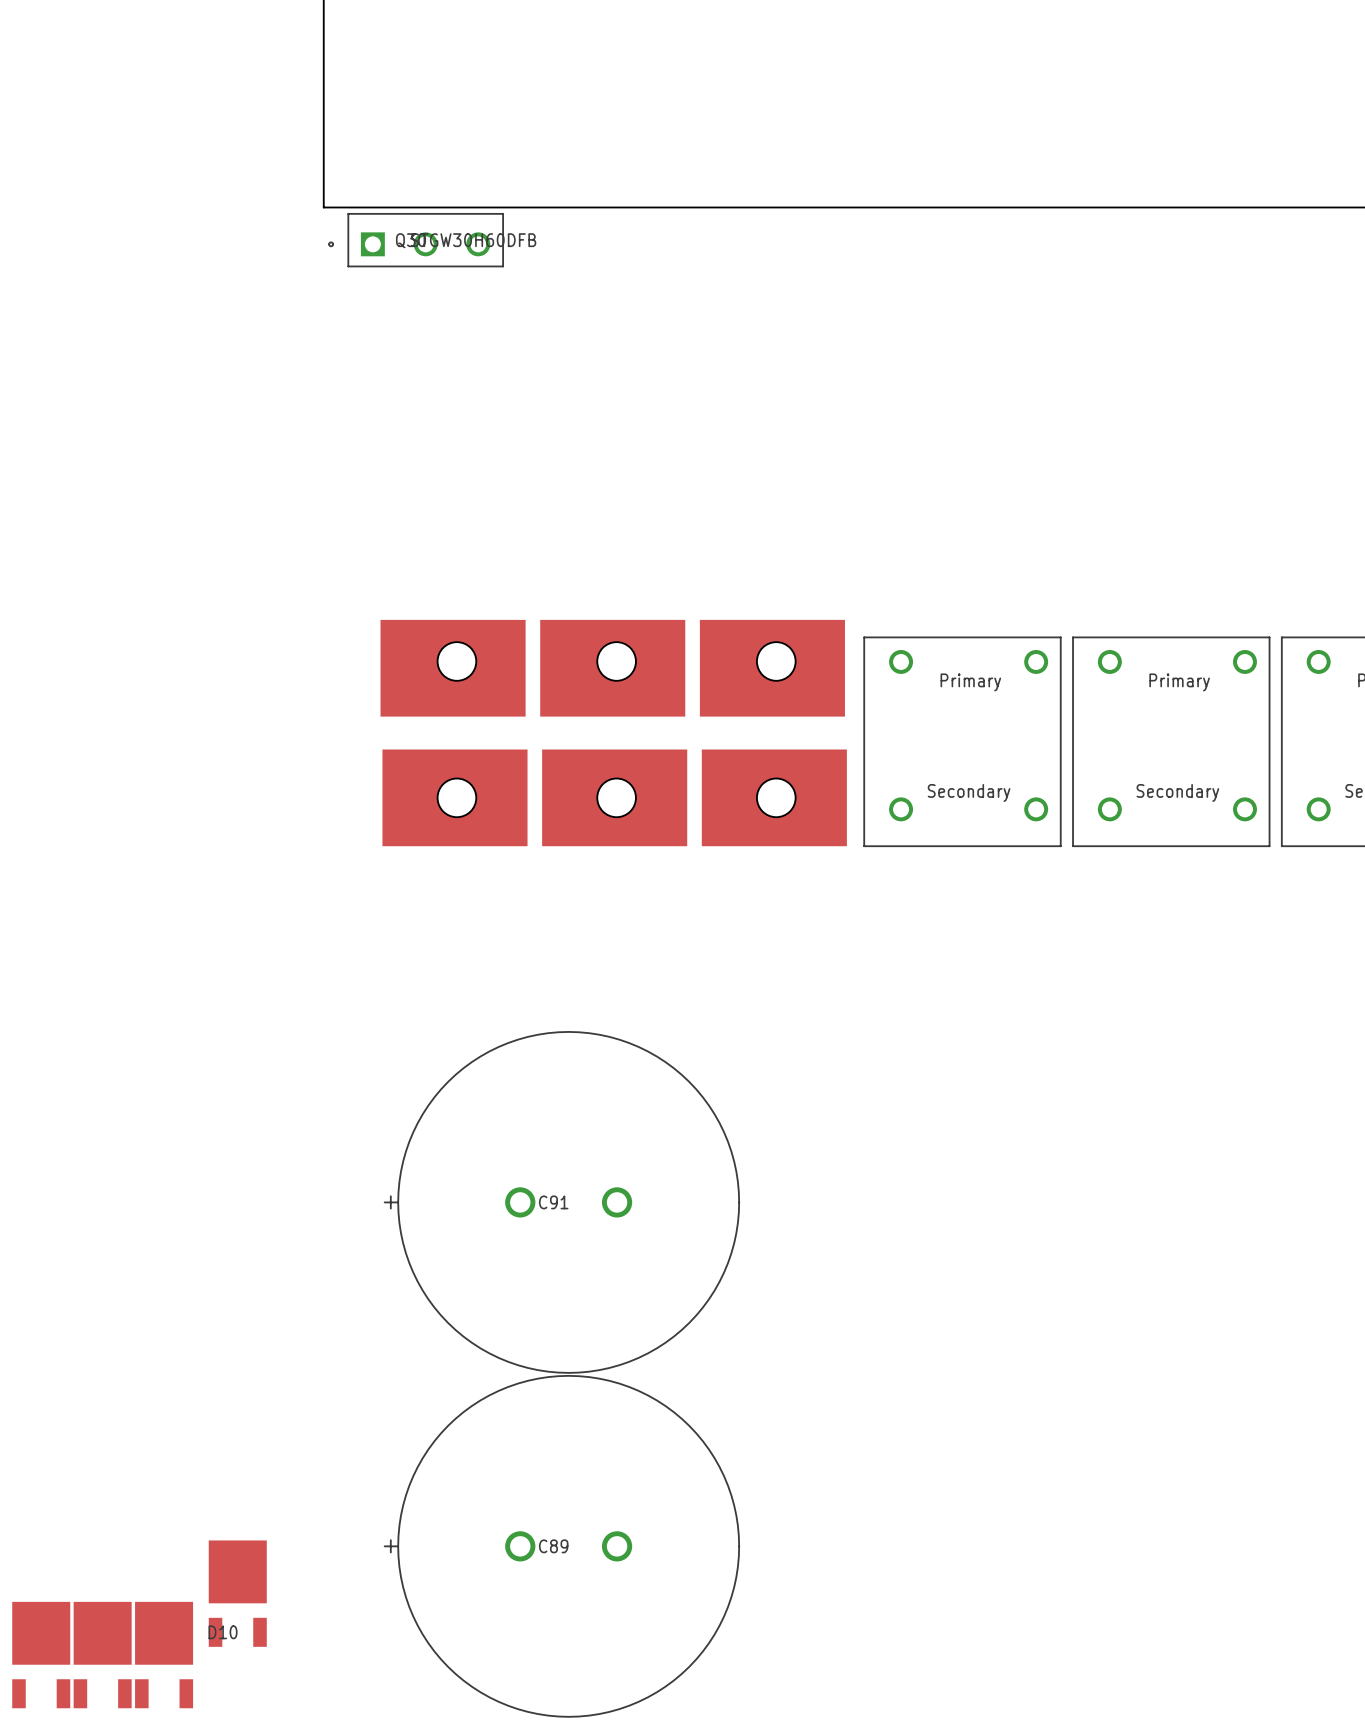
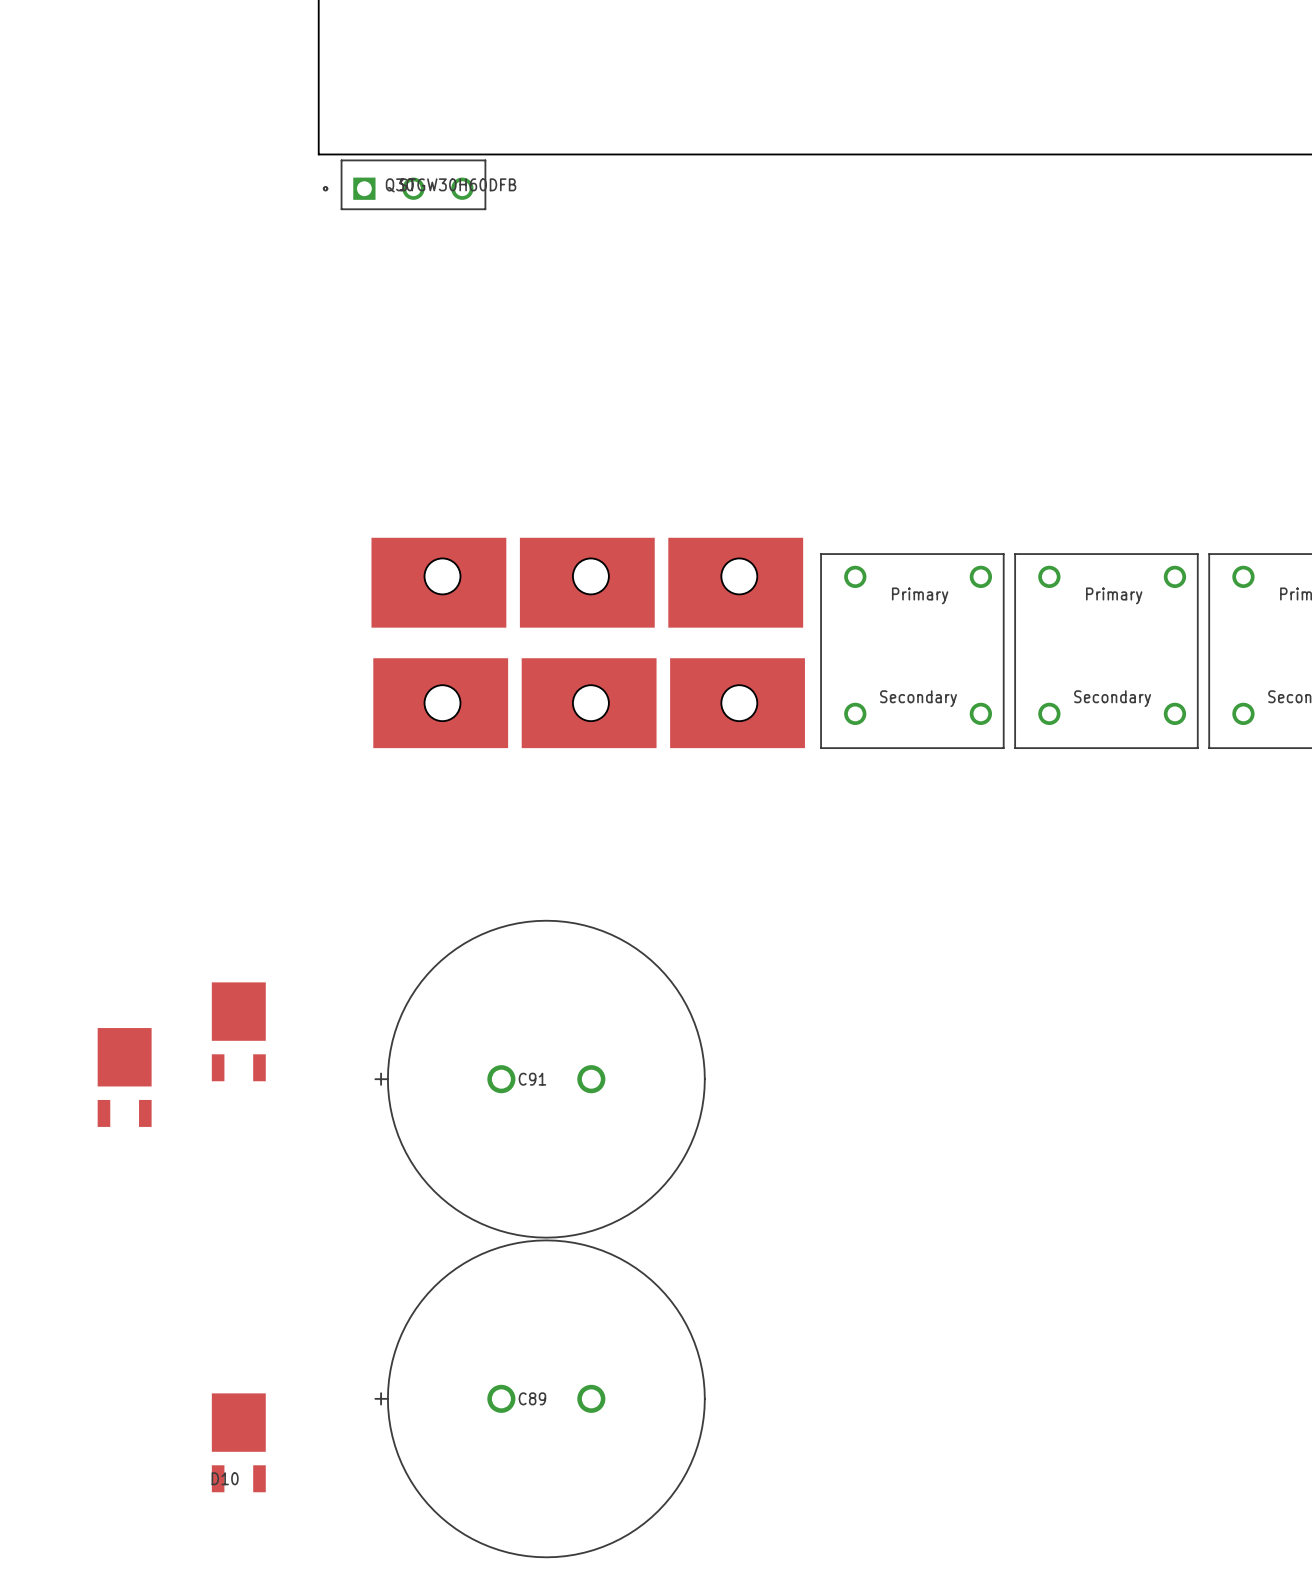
part: none -> (238, 1031)
part: none -> (124, 1077)
part: (41, 1655) -> none
part: (102, 1655) -> none
part: (164, 1655) -> none

